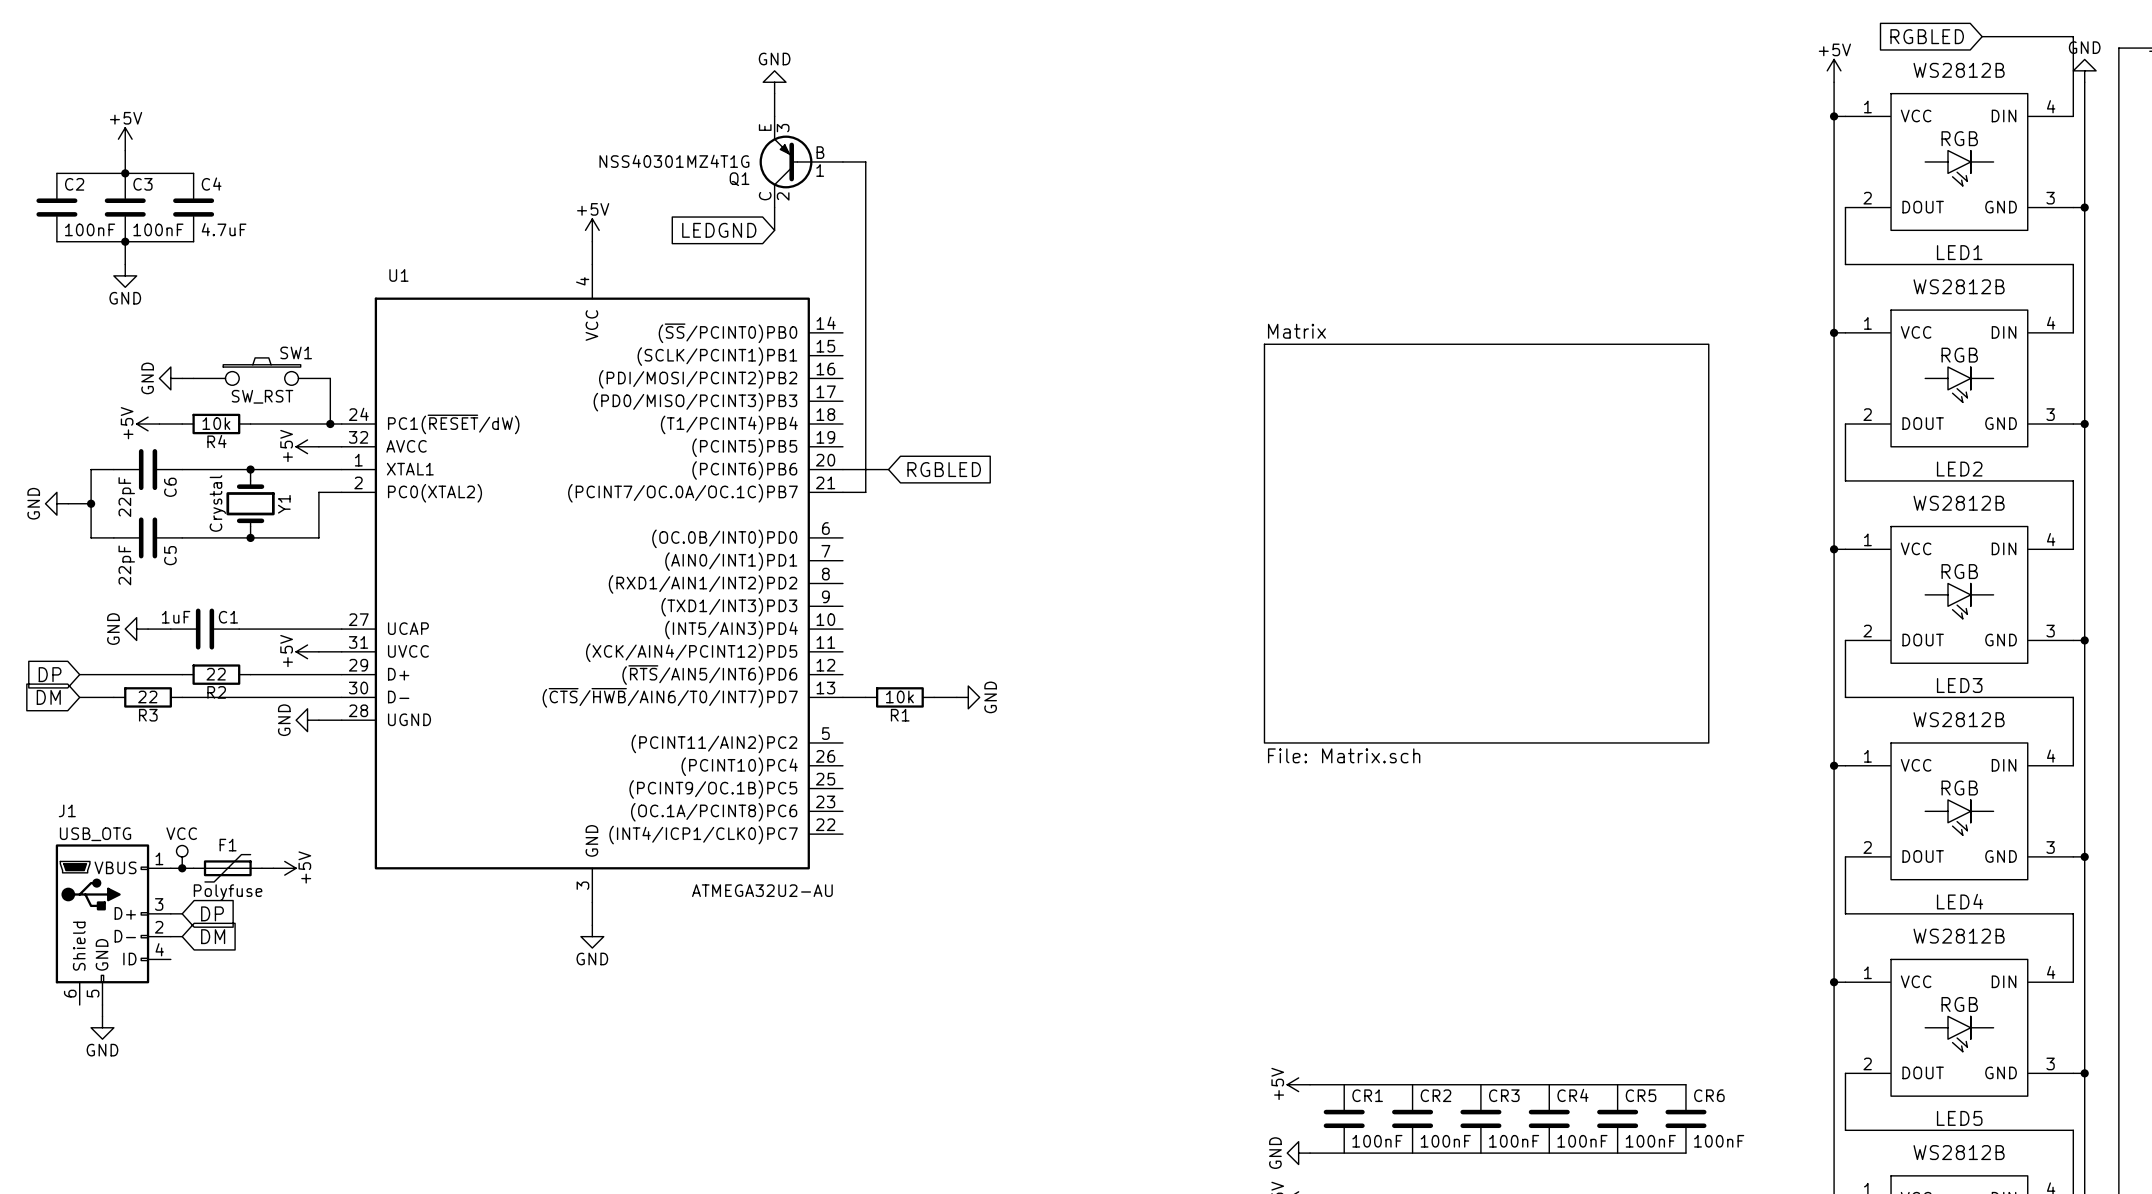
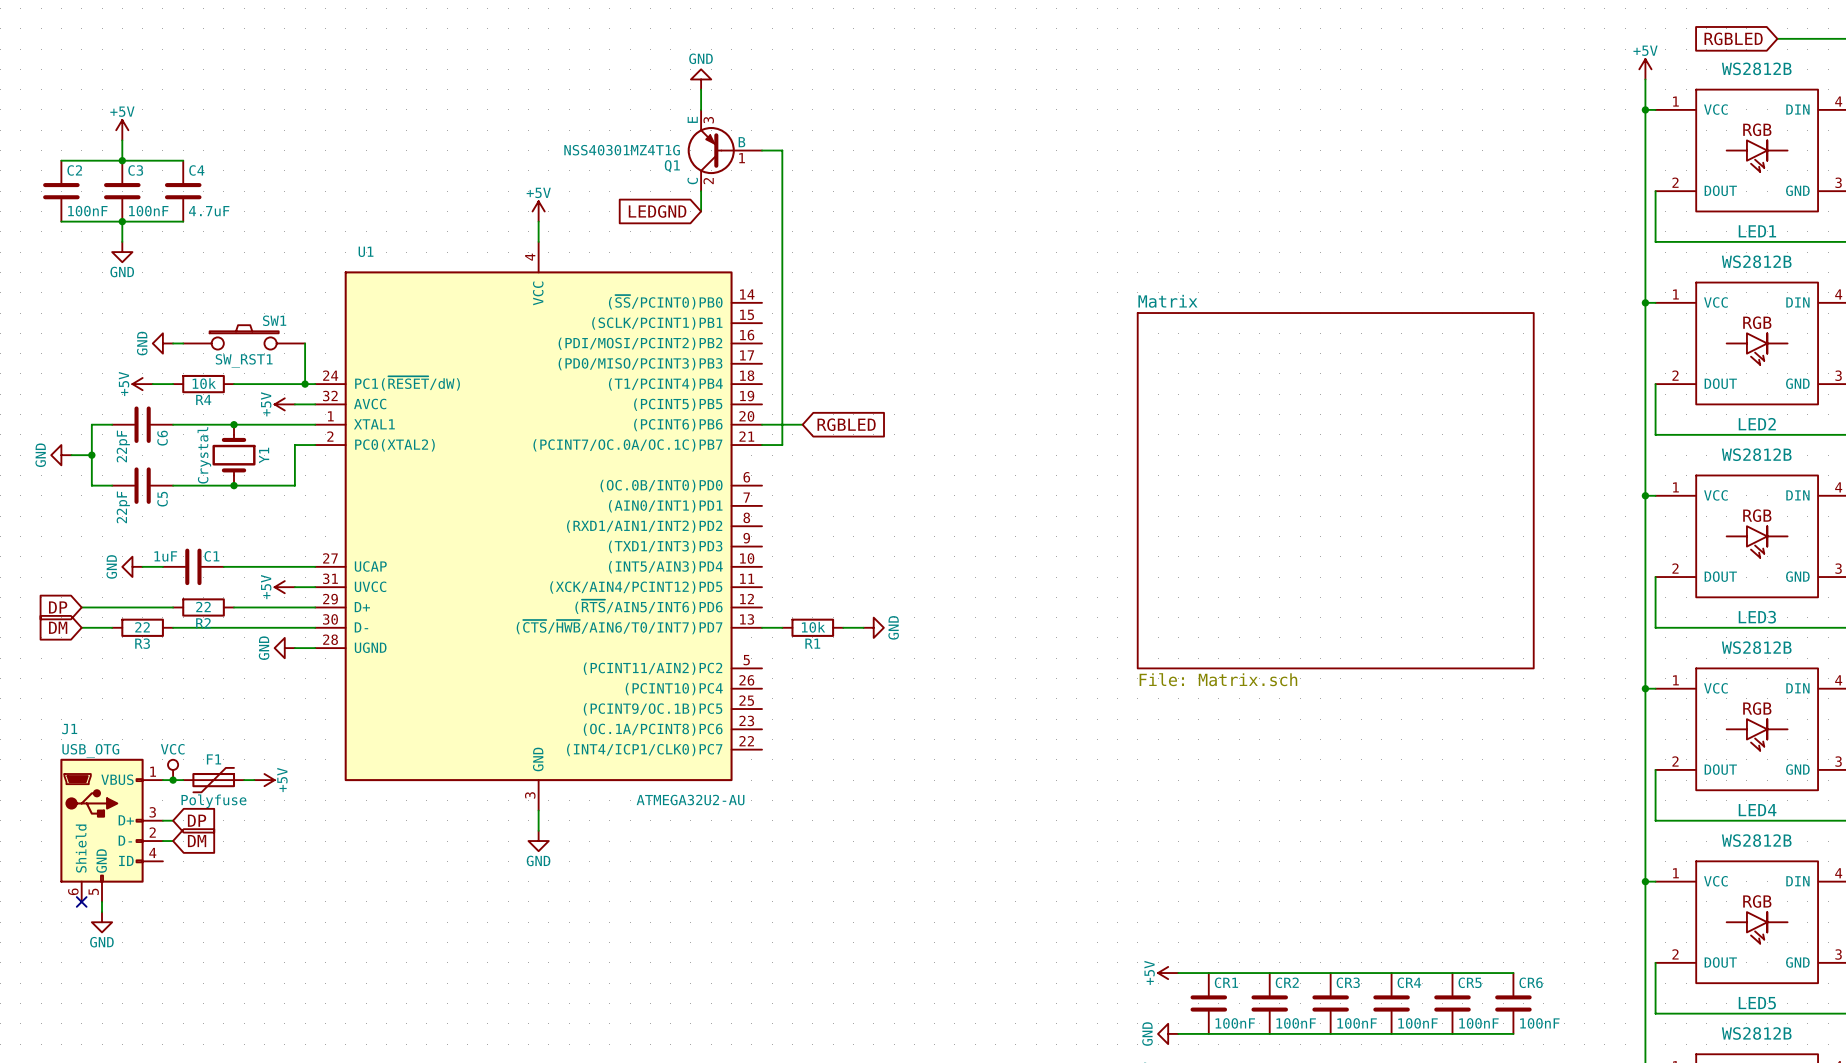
SW1 value: SW_RST (262, 396) -> SW_RST1 (244, 360)
no-connect mark: none -> (81, 901)

